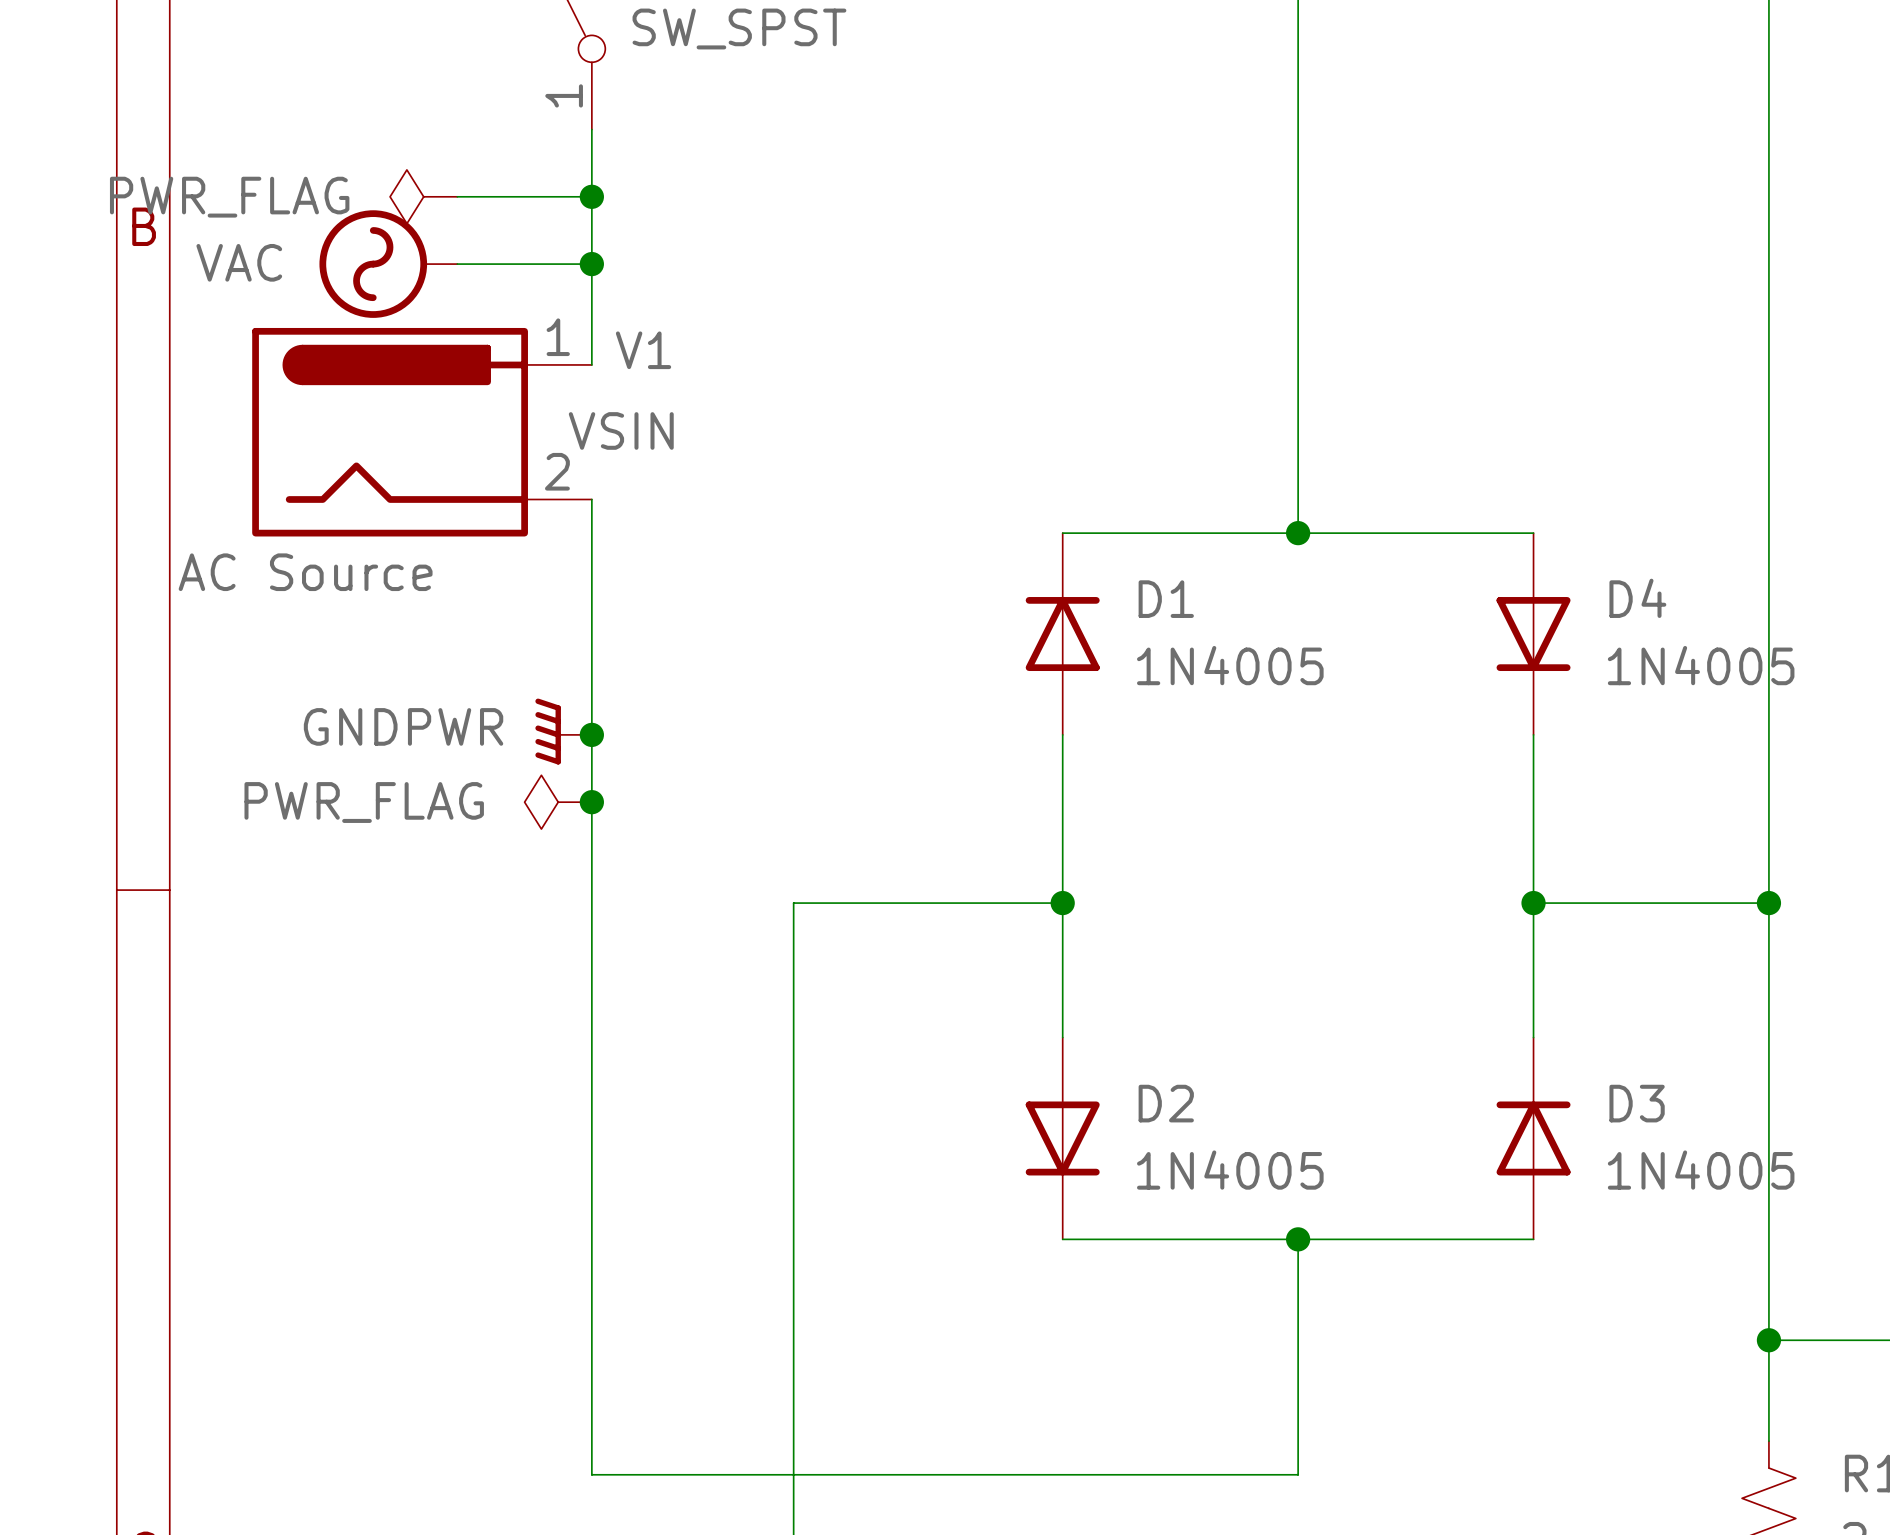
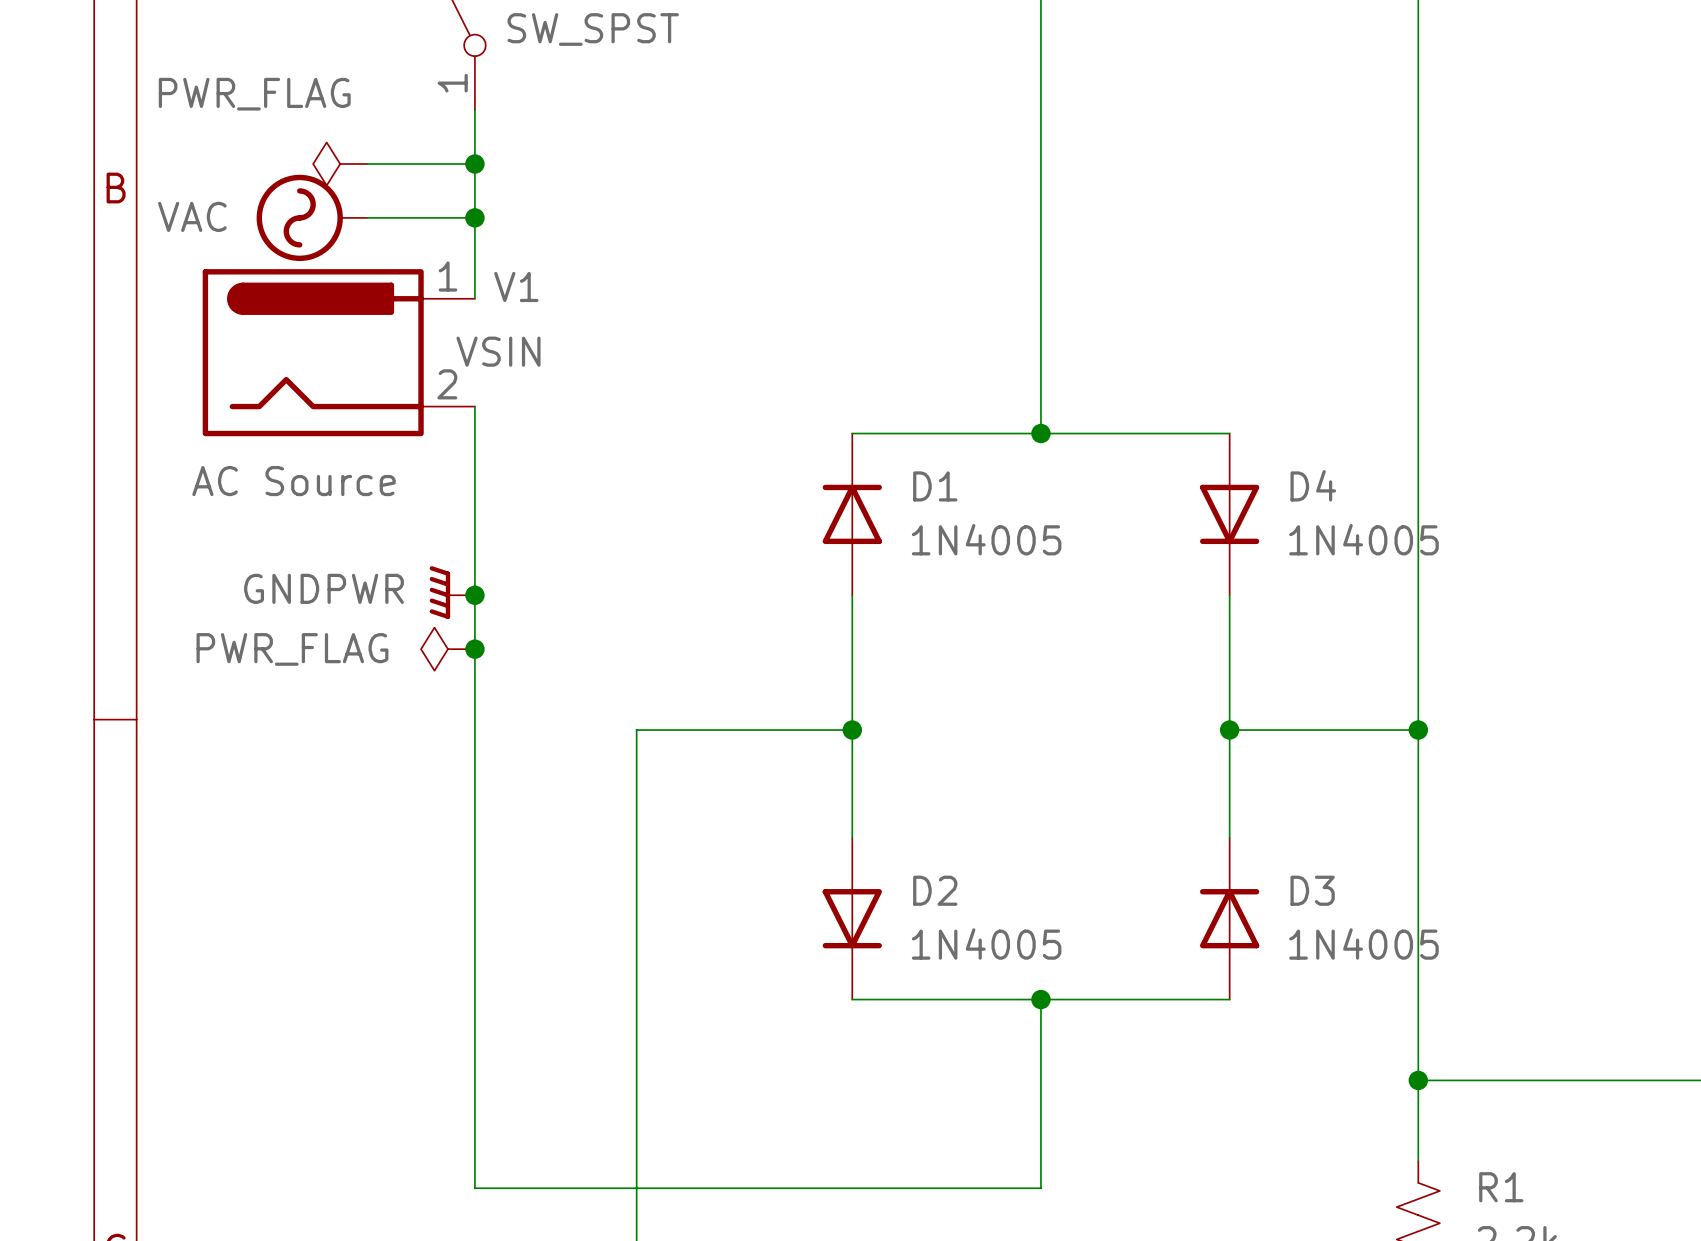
power symbol text position: PWR_FLAG (229, 197) -> PWR_FLAG (254, 94)
V1 text position: AC Source (305, 572) -> AC Source (294, 481)

